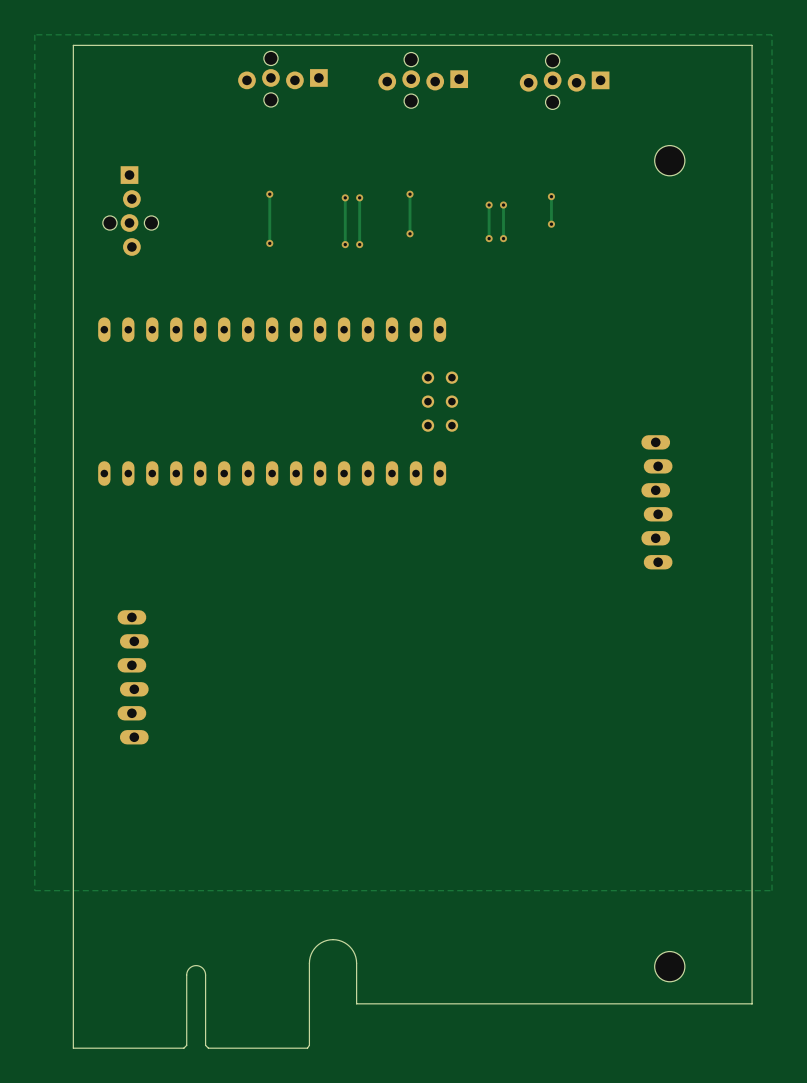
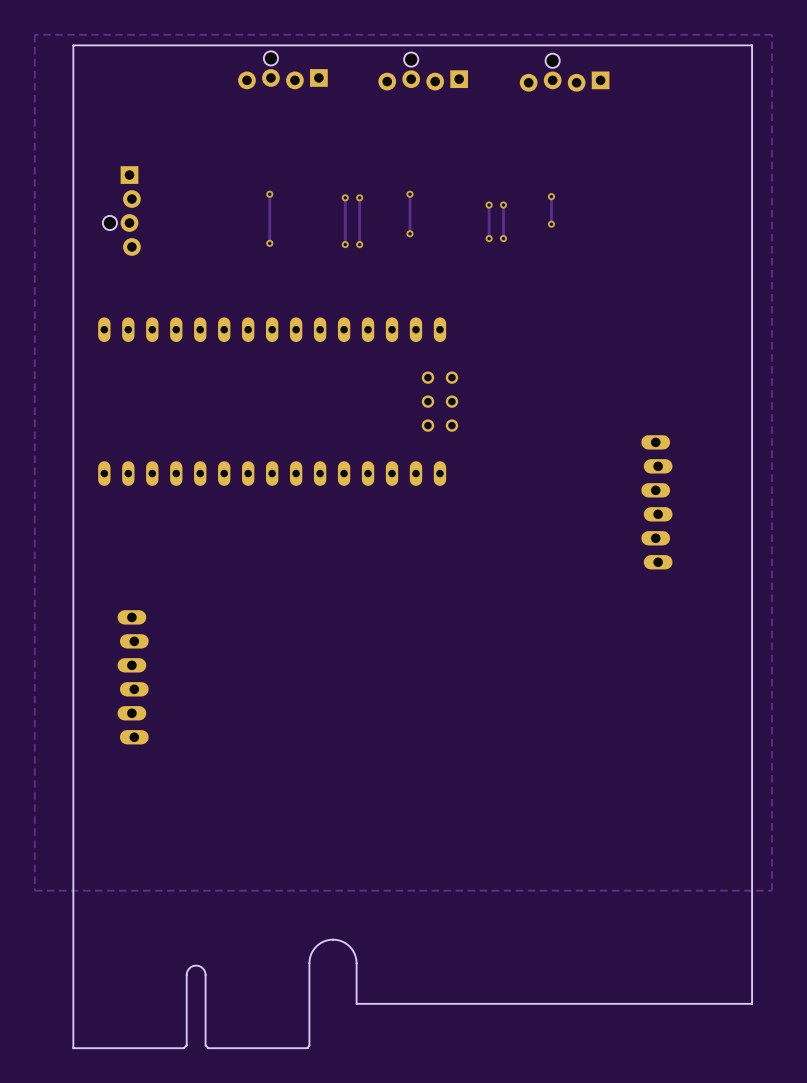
part footprint: [238, 51, 328, 108] -> [238, 51, 328, 90]
part footprint: [378, 52, 469, 109] -> [378, 52, 469, 91]
part footprint: [519, 53, 610, 110] -> [519, 53, 610, 92]
hole: (669, 160) -> none
part footprint: [102, 166, 159, 256] -> [102, 166, 141, 256]
hole: (669, 966) -> none

